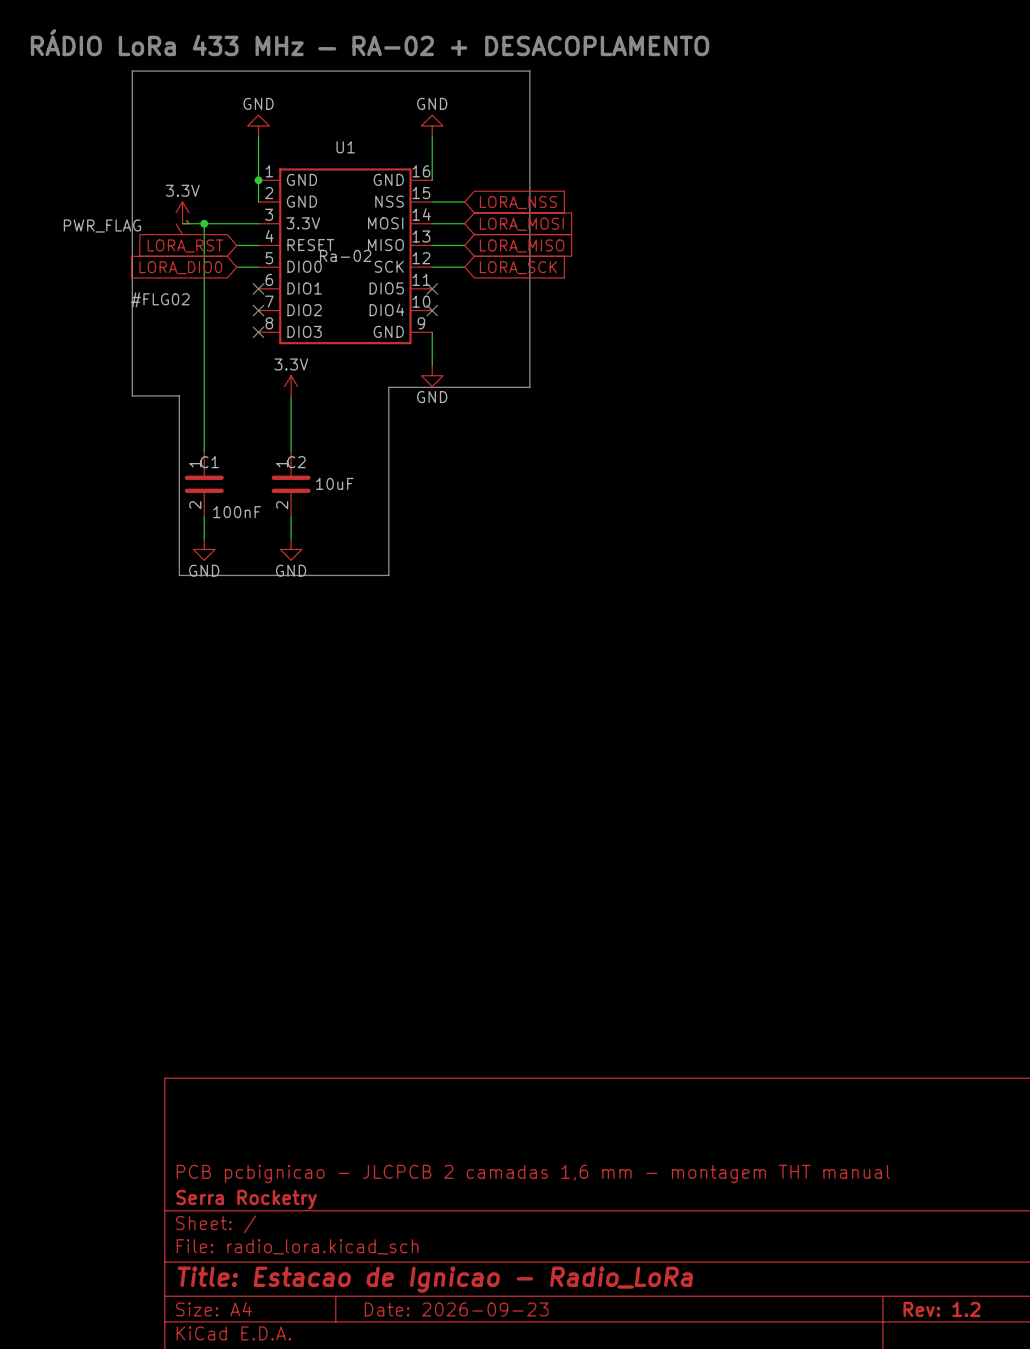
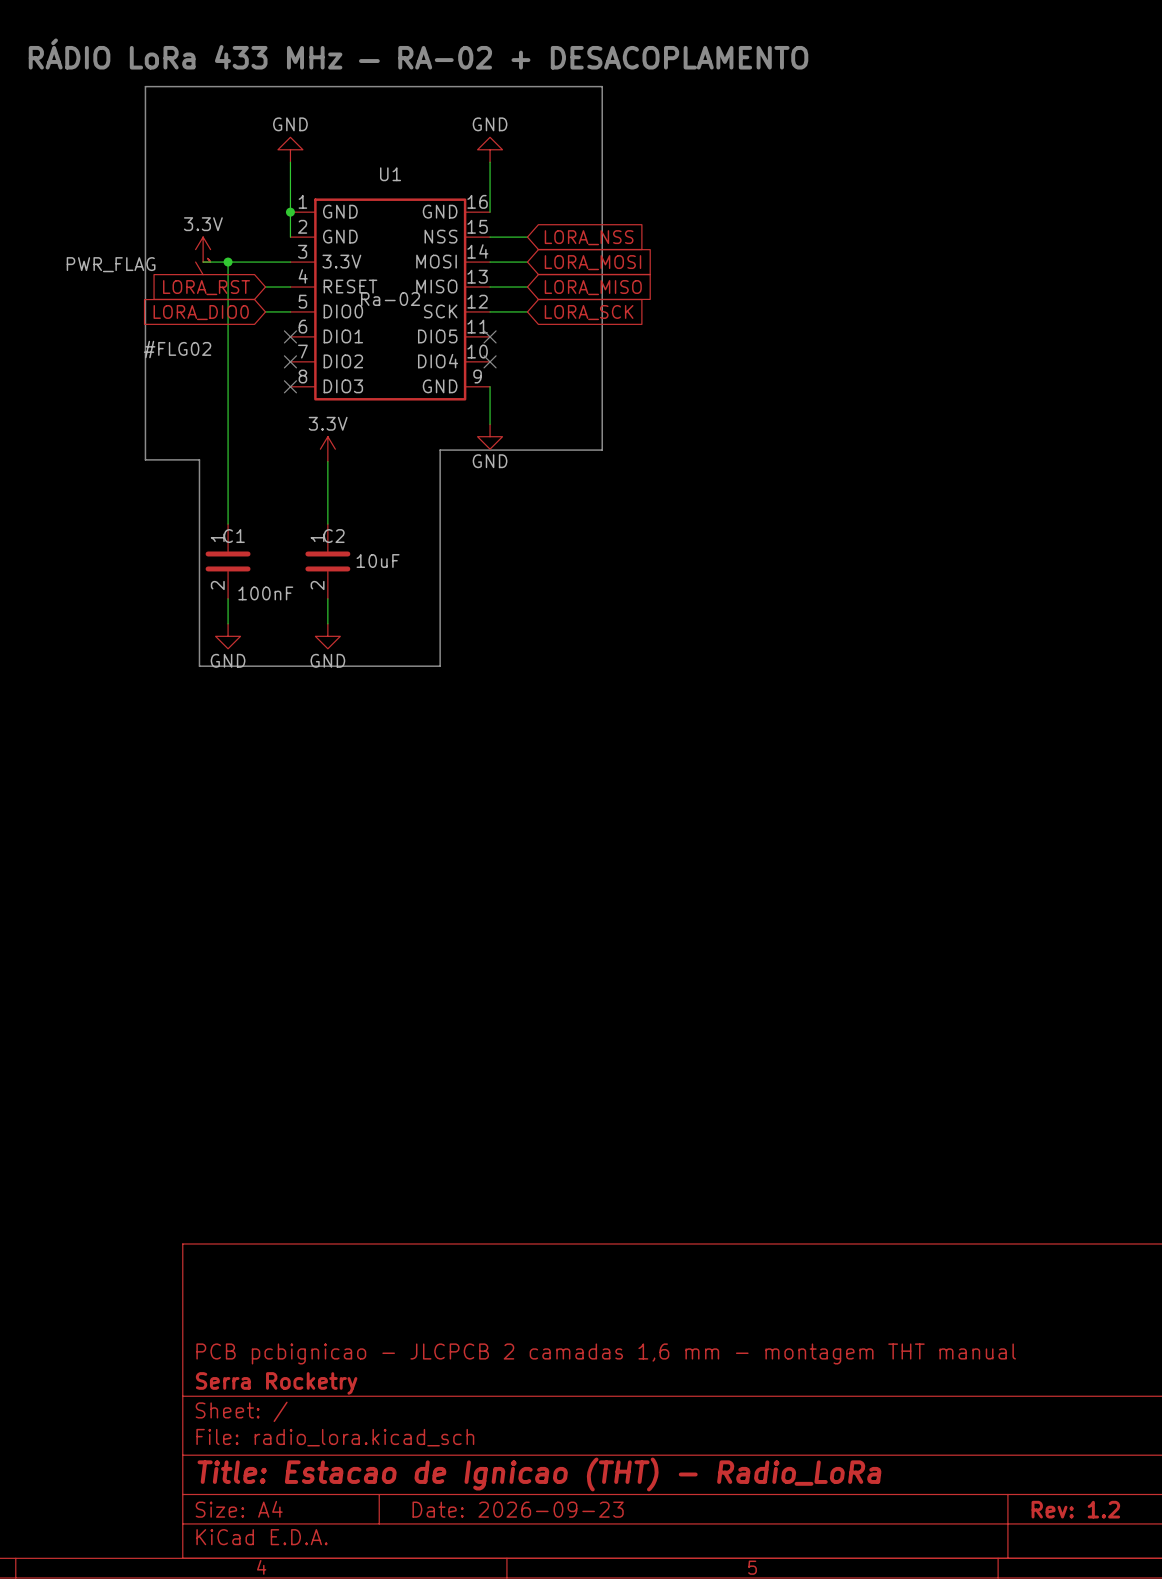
title block: Title: Estacao de Ignicao - Radio_LoRa (435, 1279) -> Title: Estacao de Ignicao (THT) - Radio_LoRa (539, 1474)

